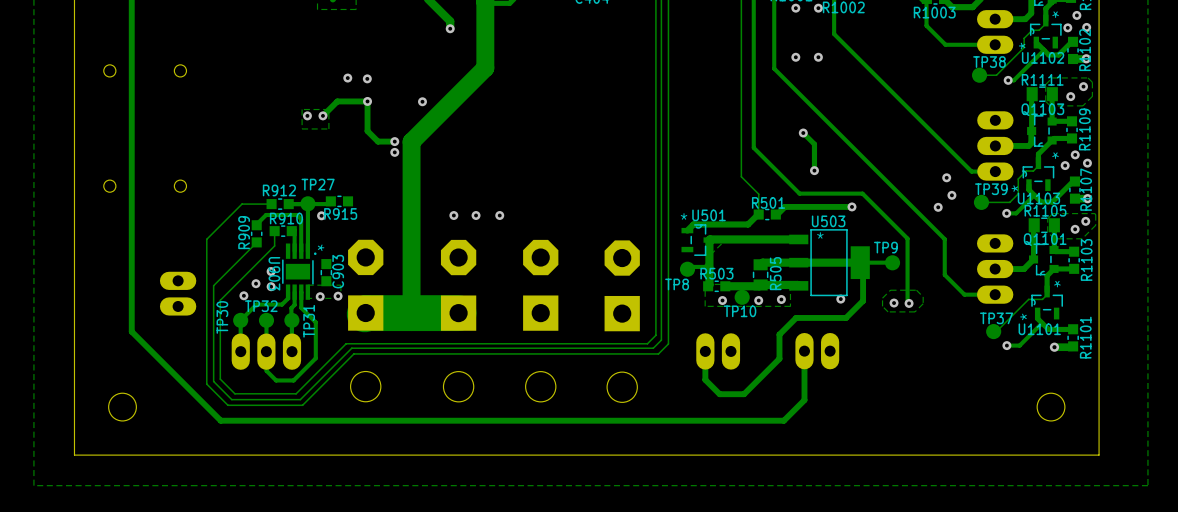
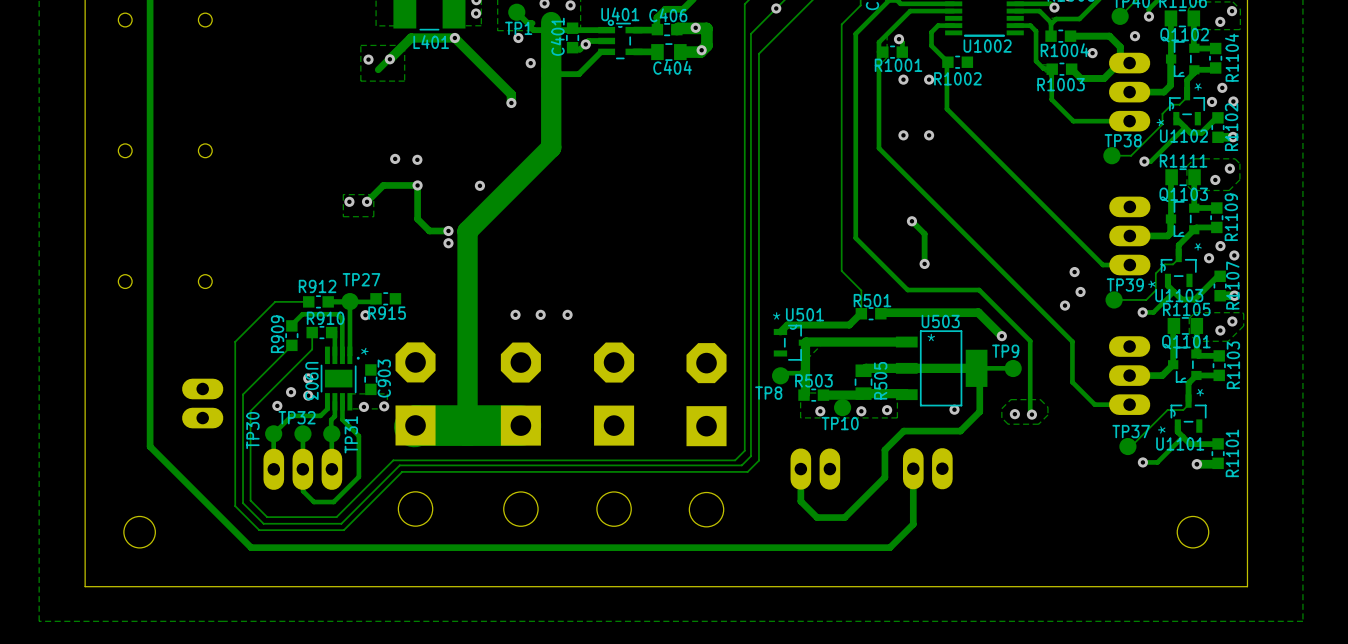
track: (851, 206) (784, 206) (777, 214) -> (1001, 336) (978, 312) (882, 313)
via position: (851, 206) -> (1001, 336)

